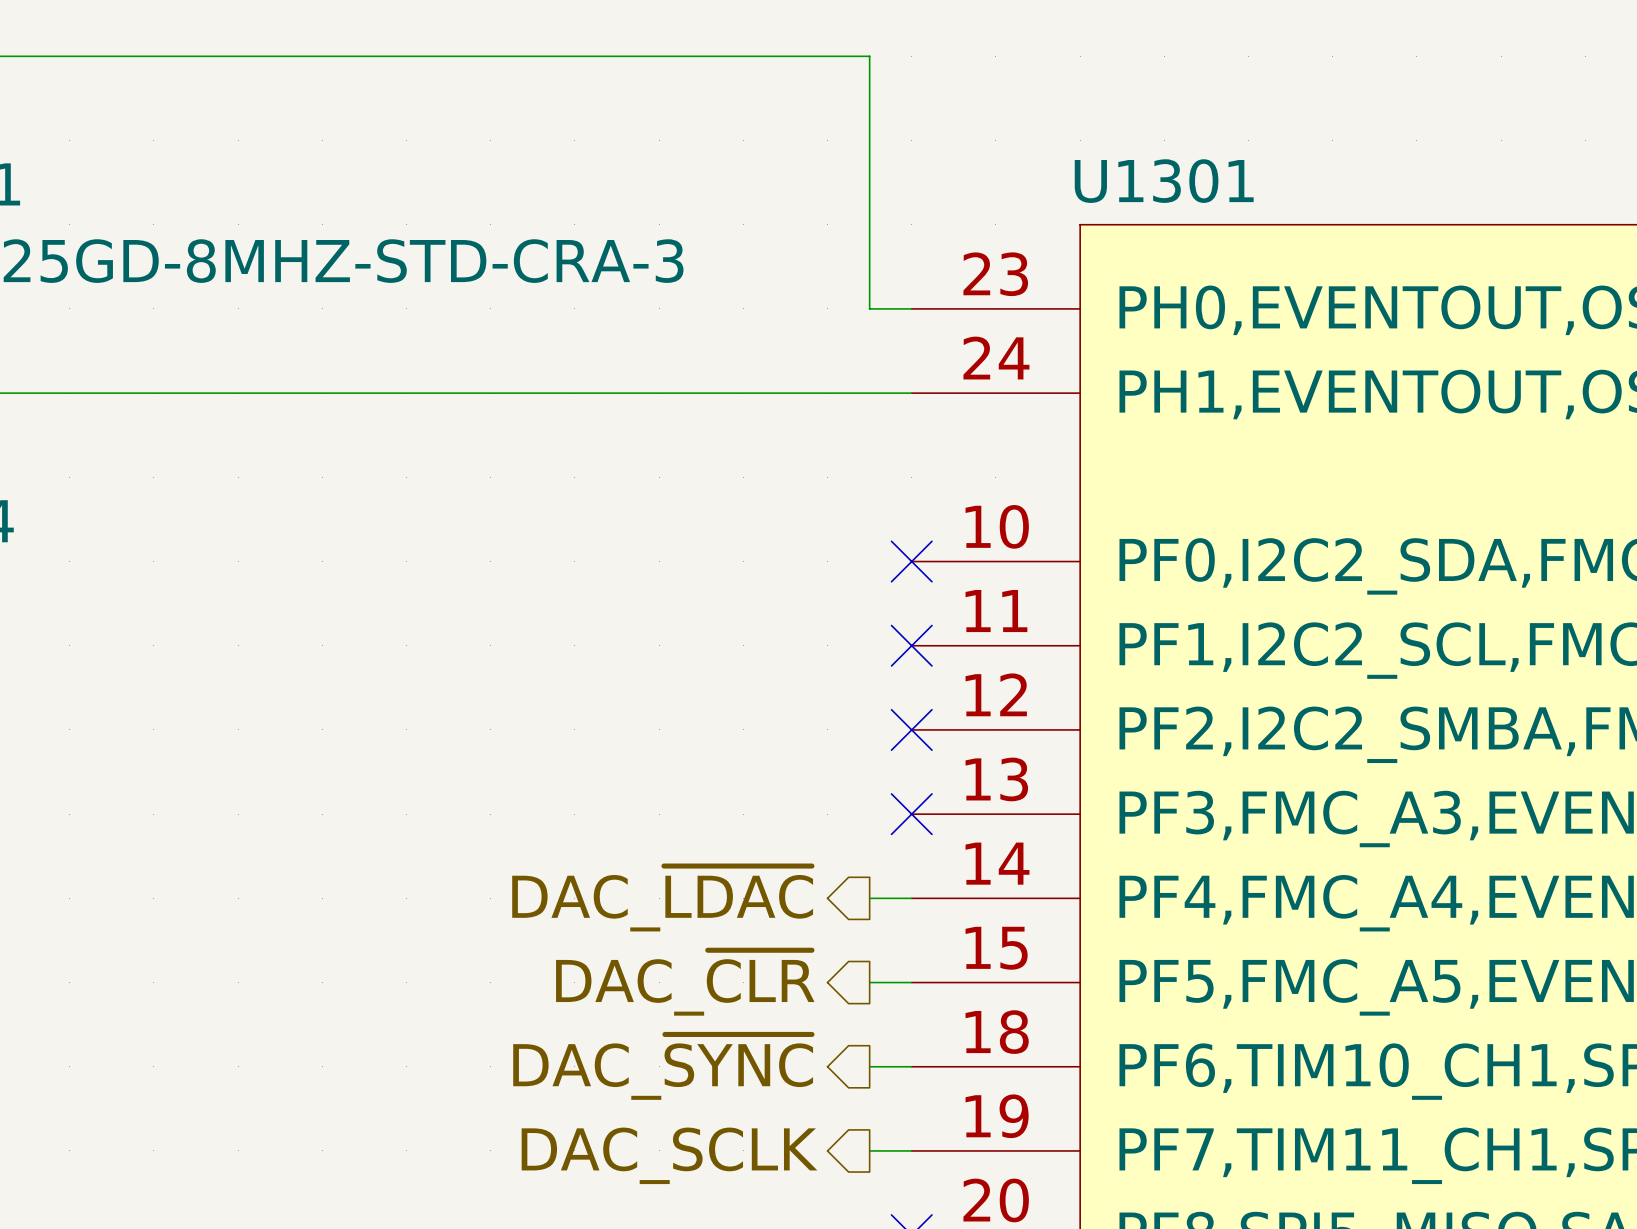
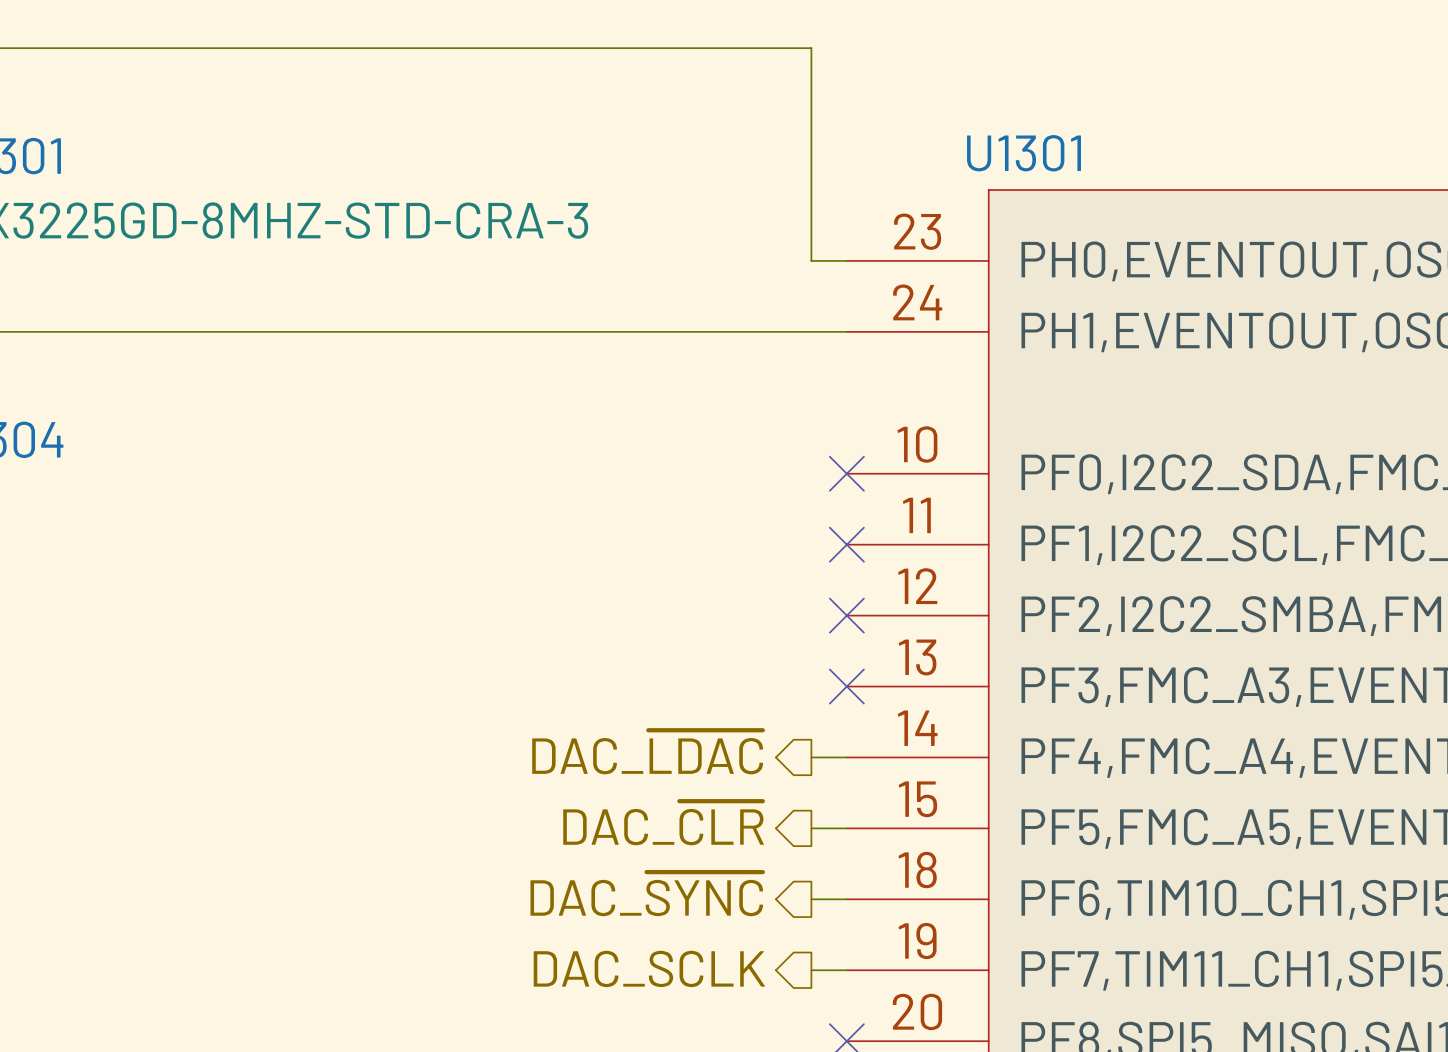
U1301 name position: U1301 (1164, 181) -> U1301 (1024, 153)

